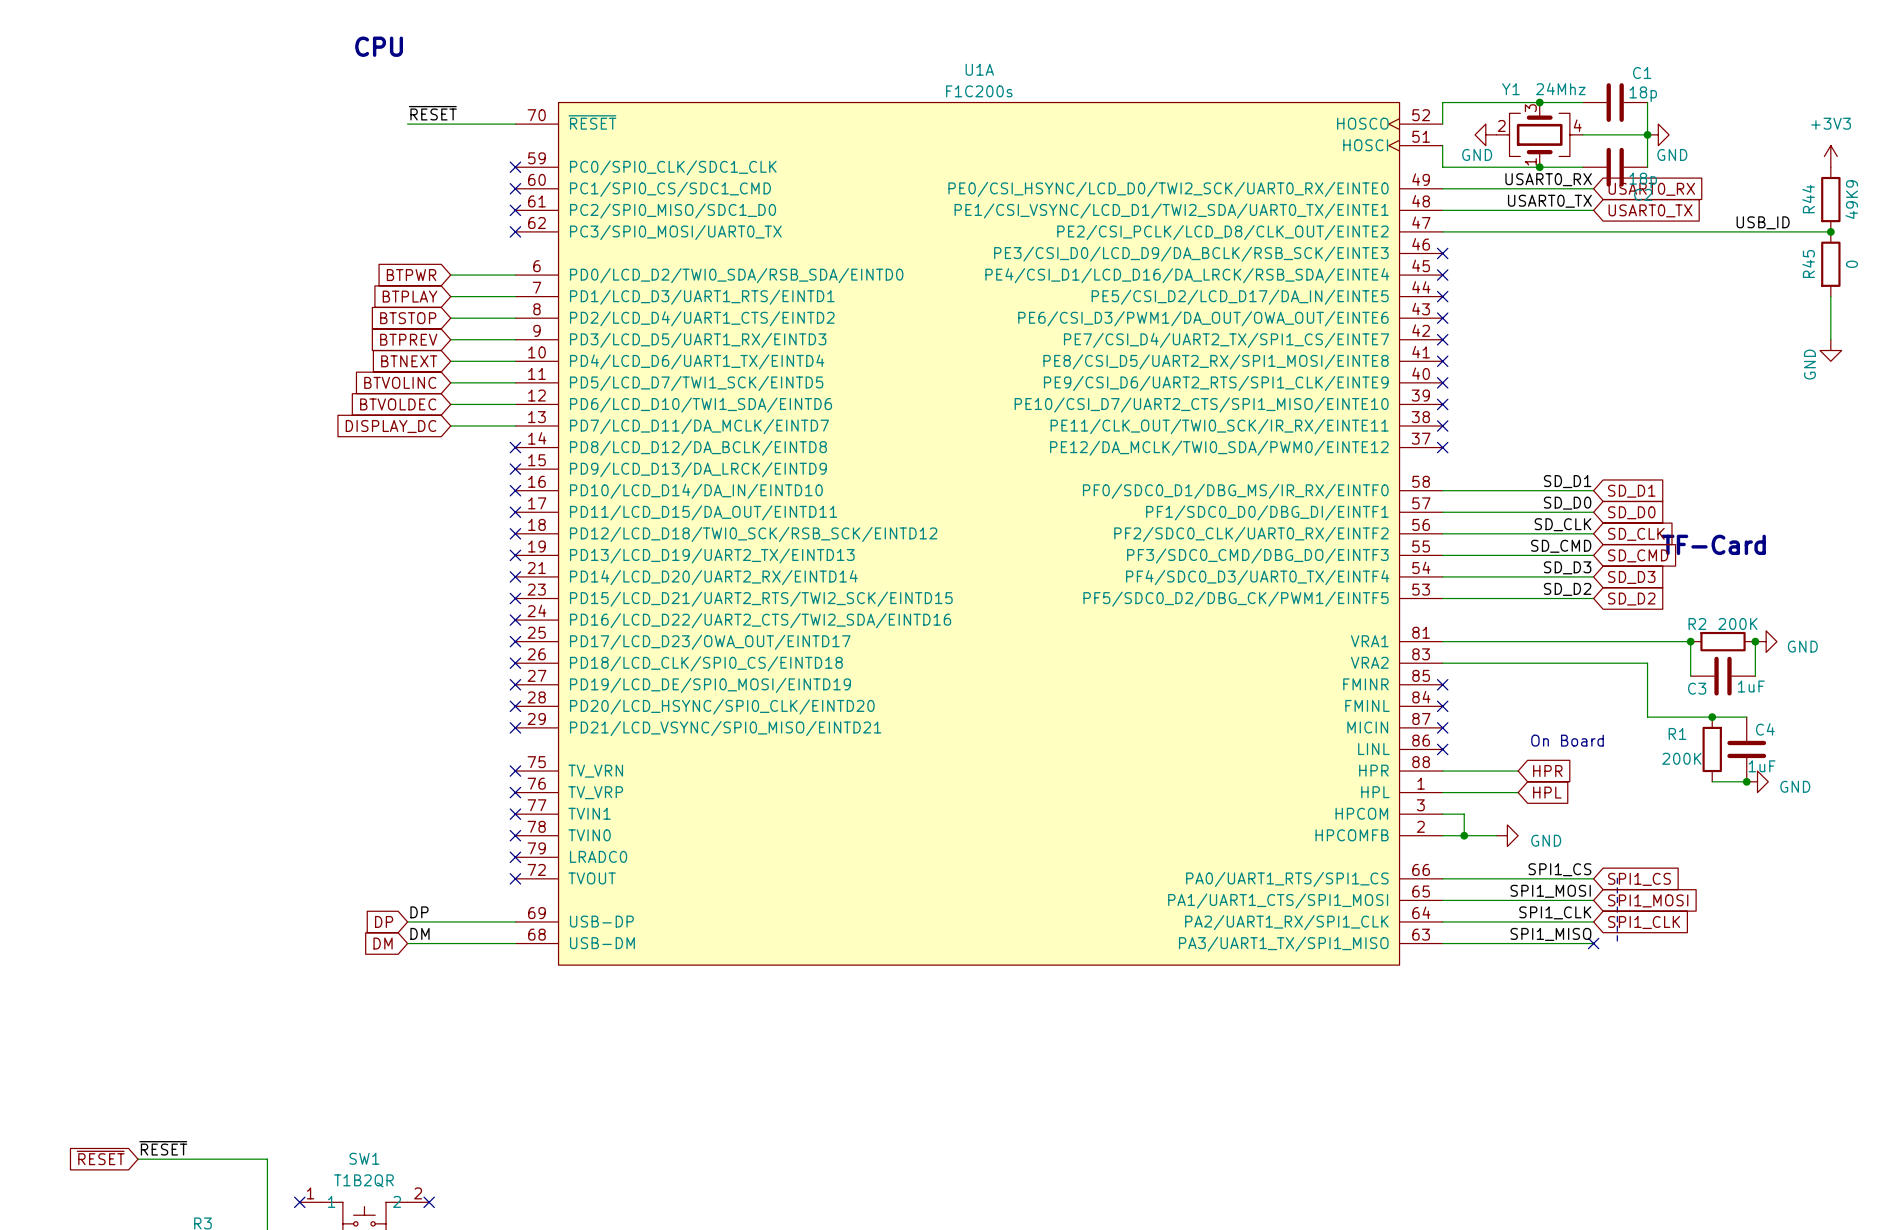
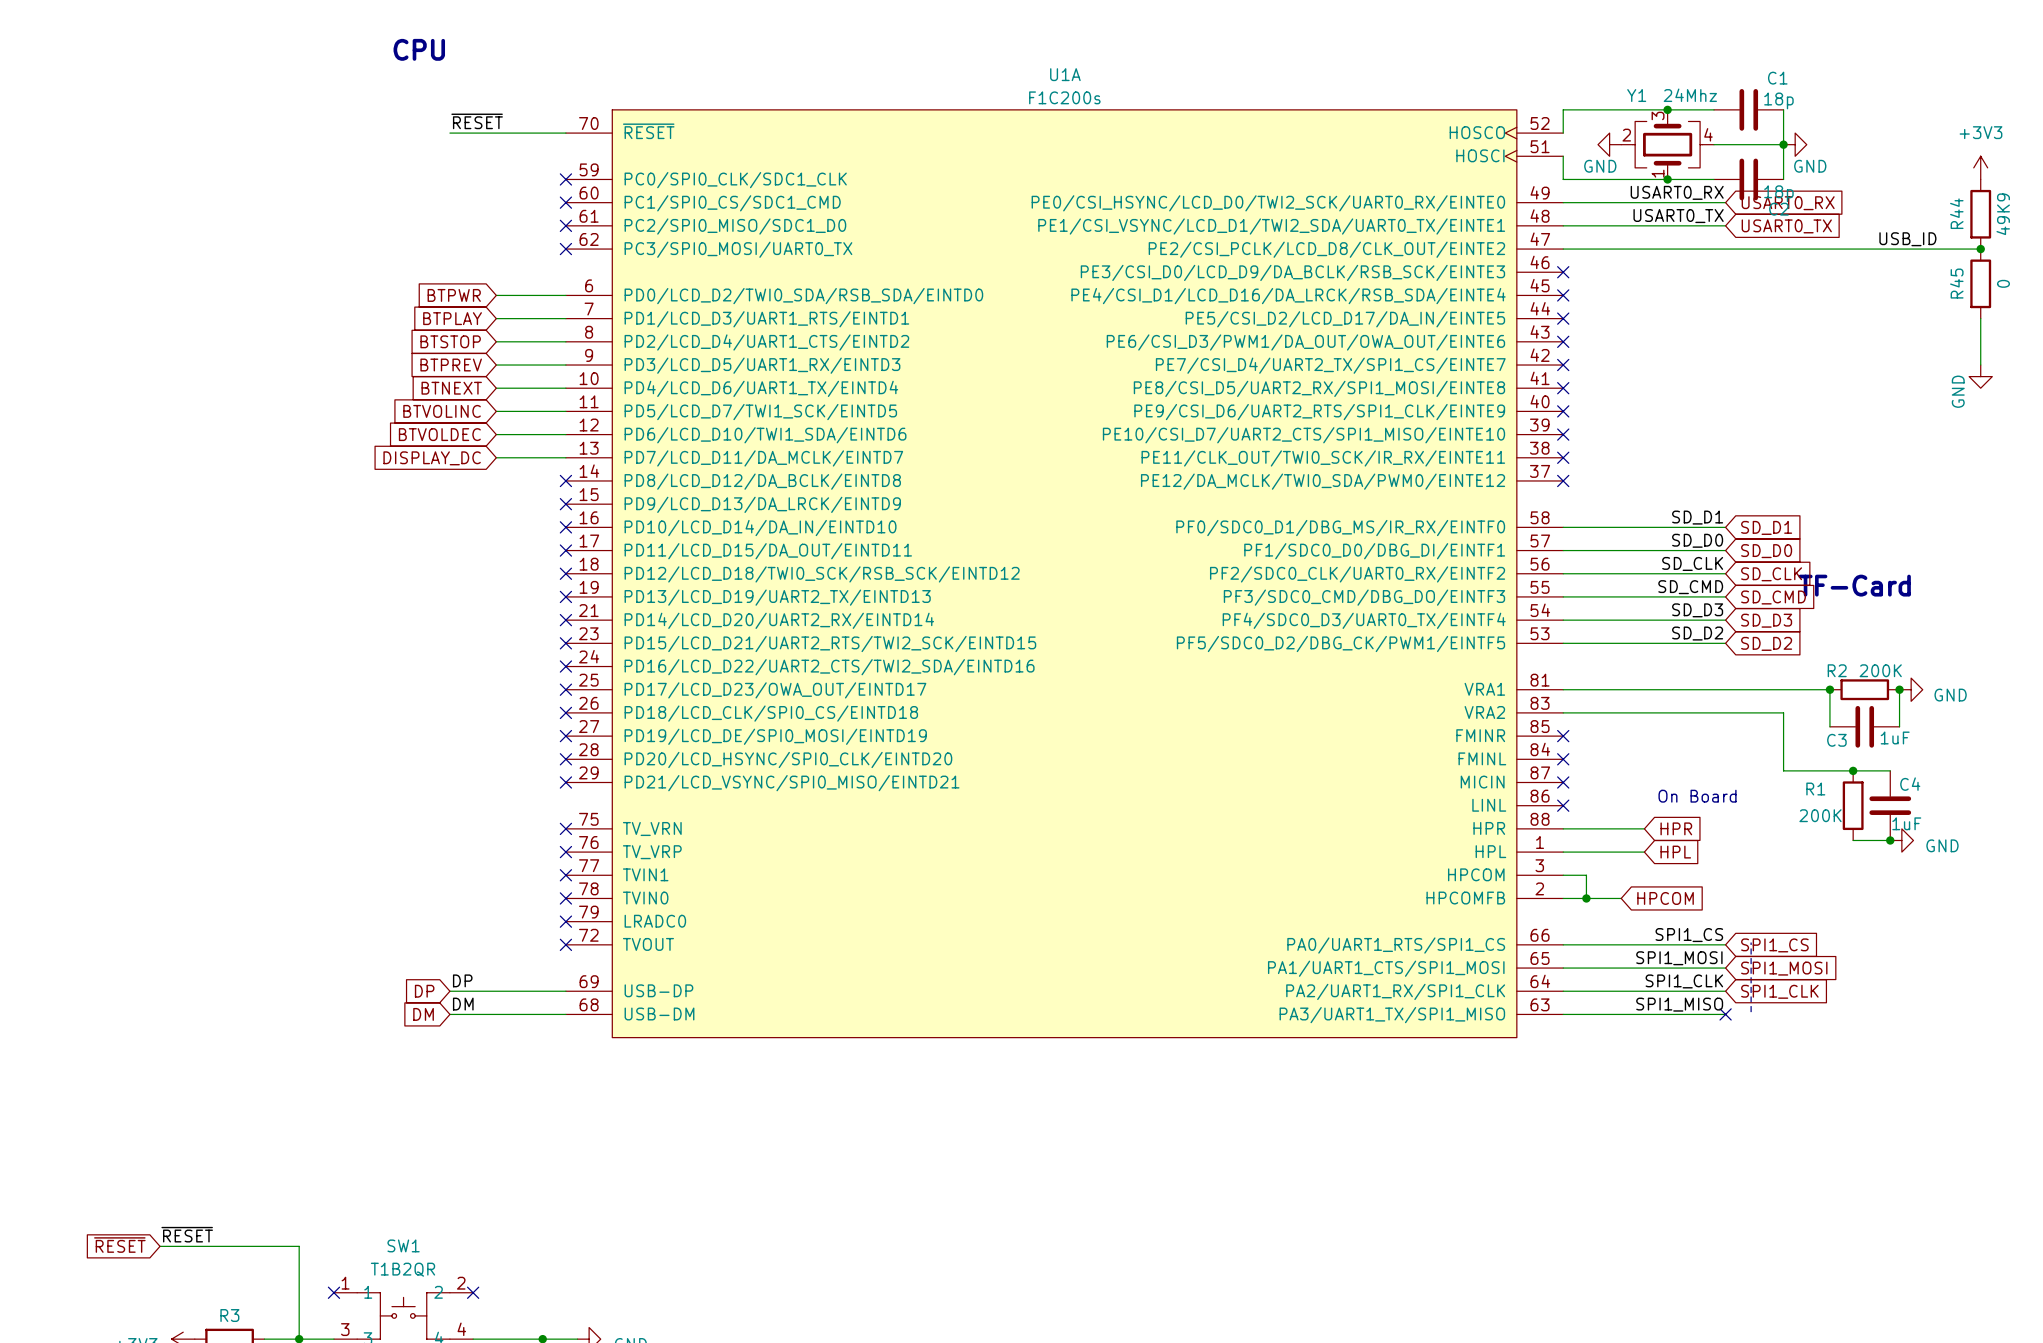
power symbol: GND (1507, 835) -> none
global label: none -> HPCOM (1665, 898)

